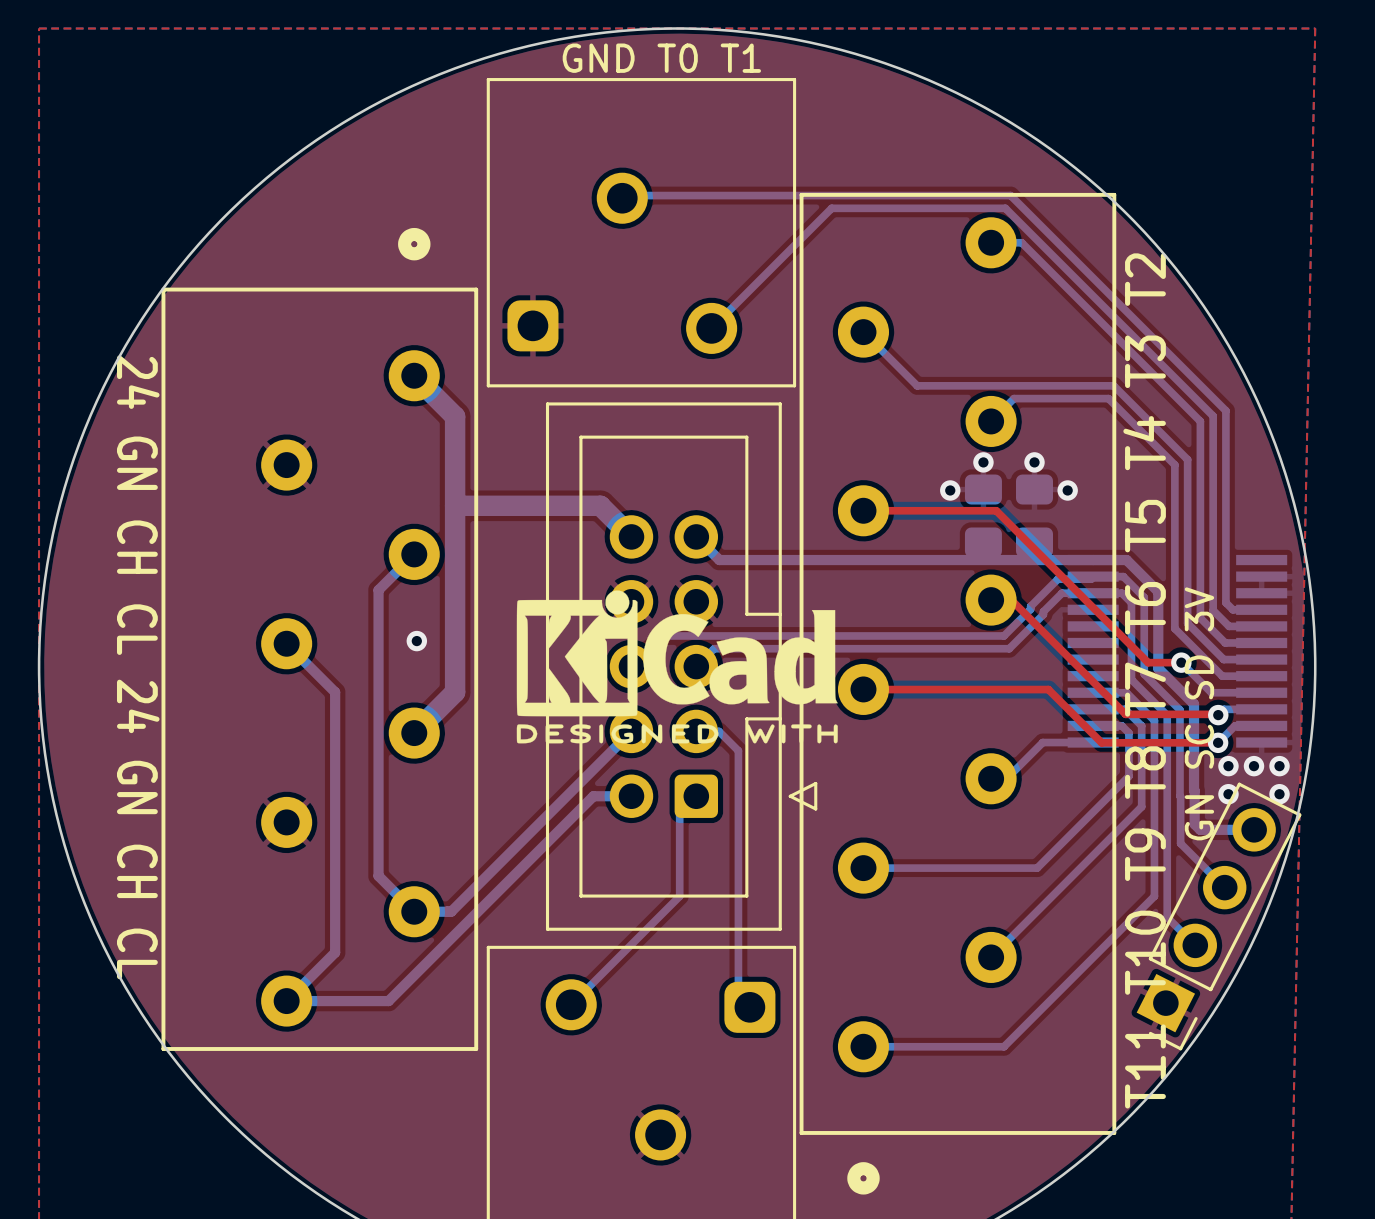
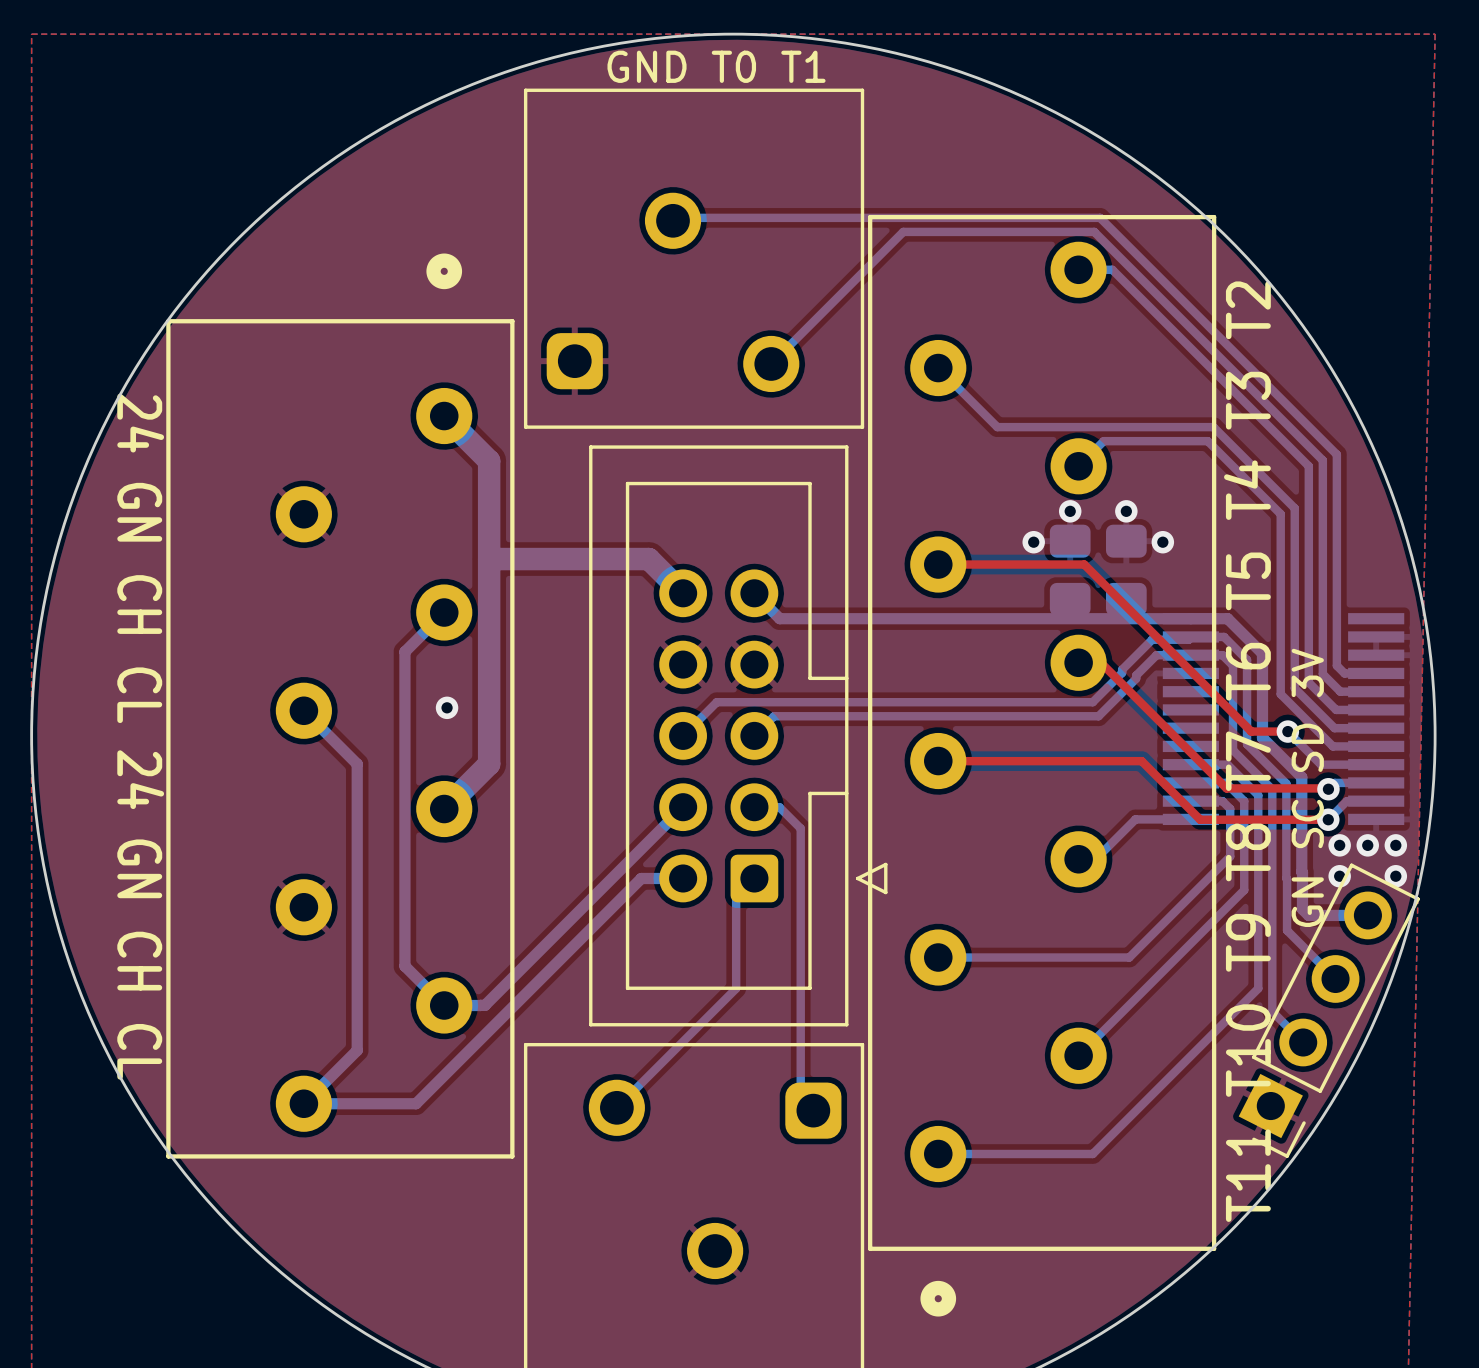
drawing: [516, 590, 838, 744] -> none

